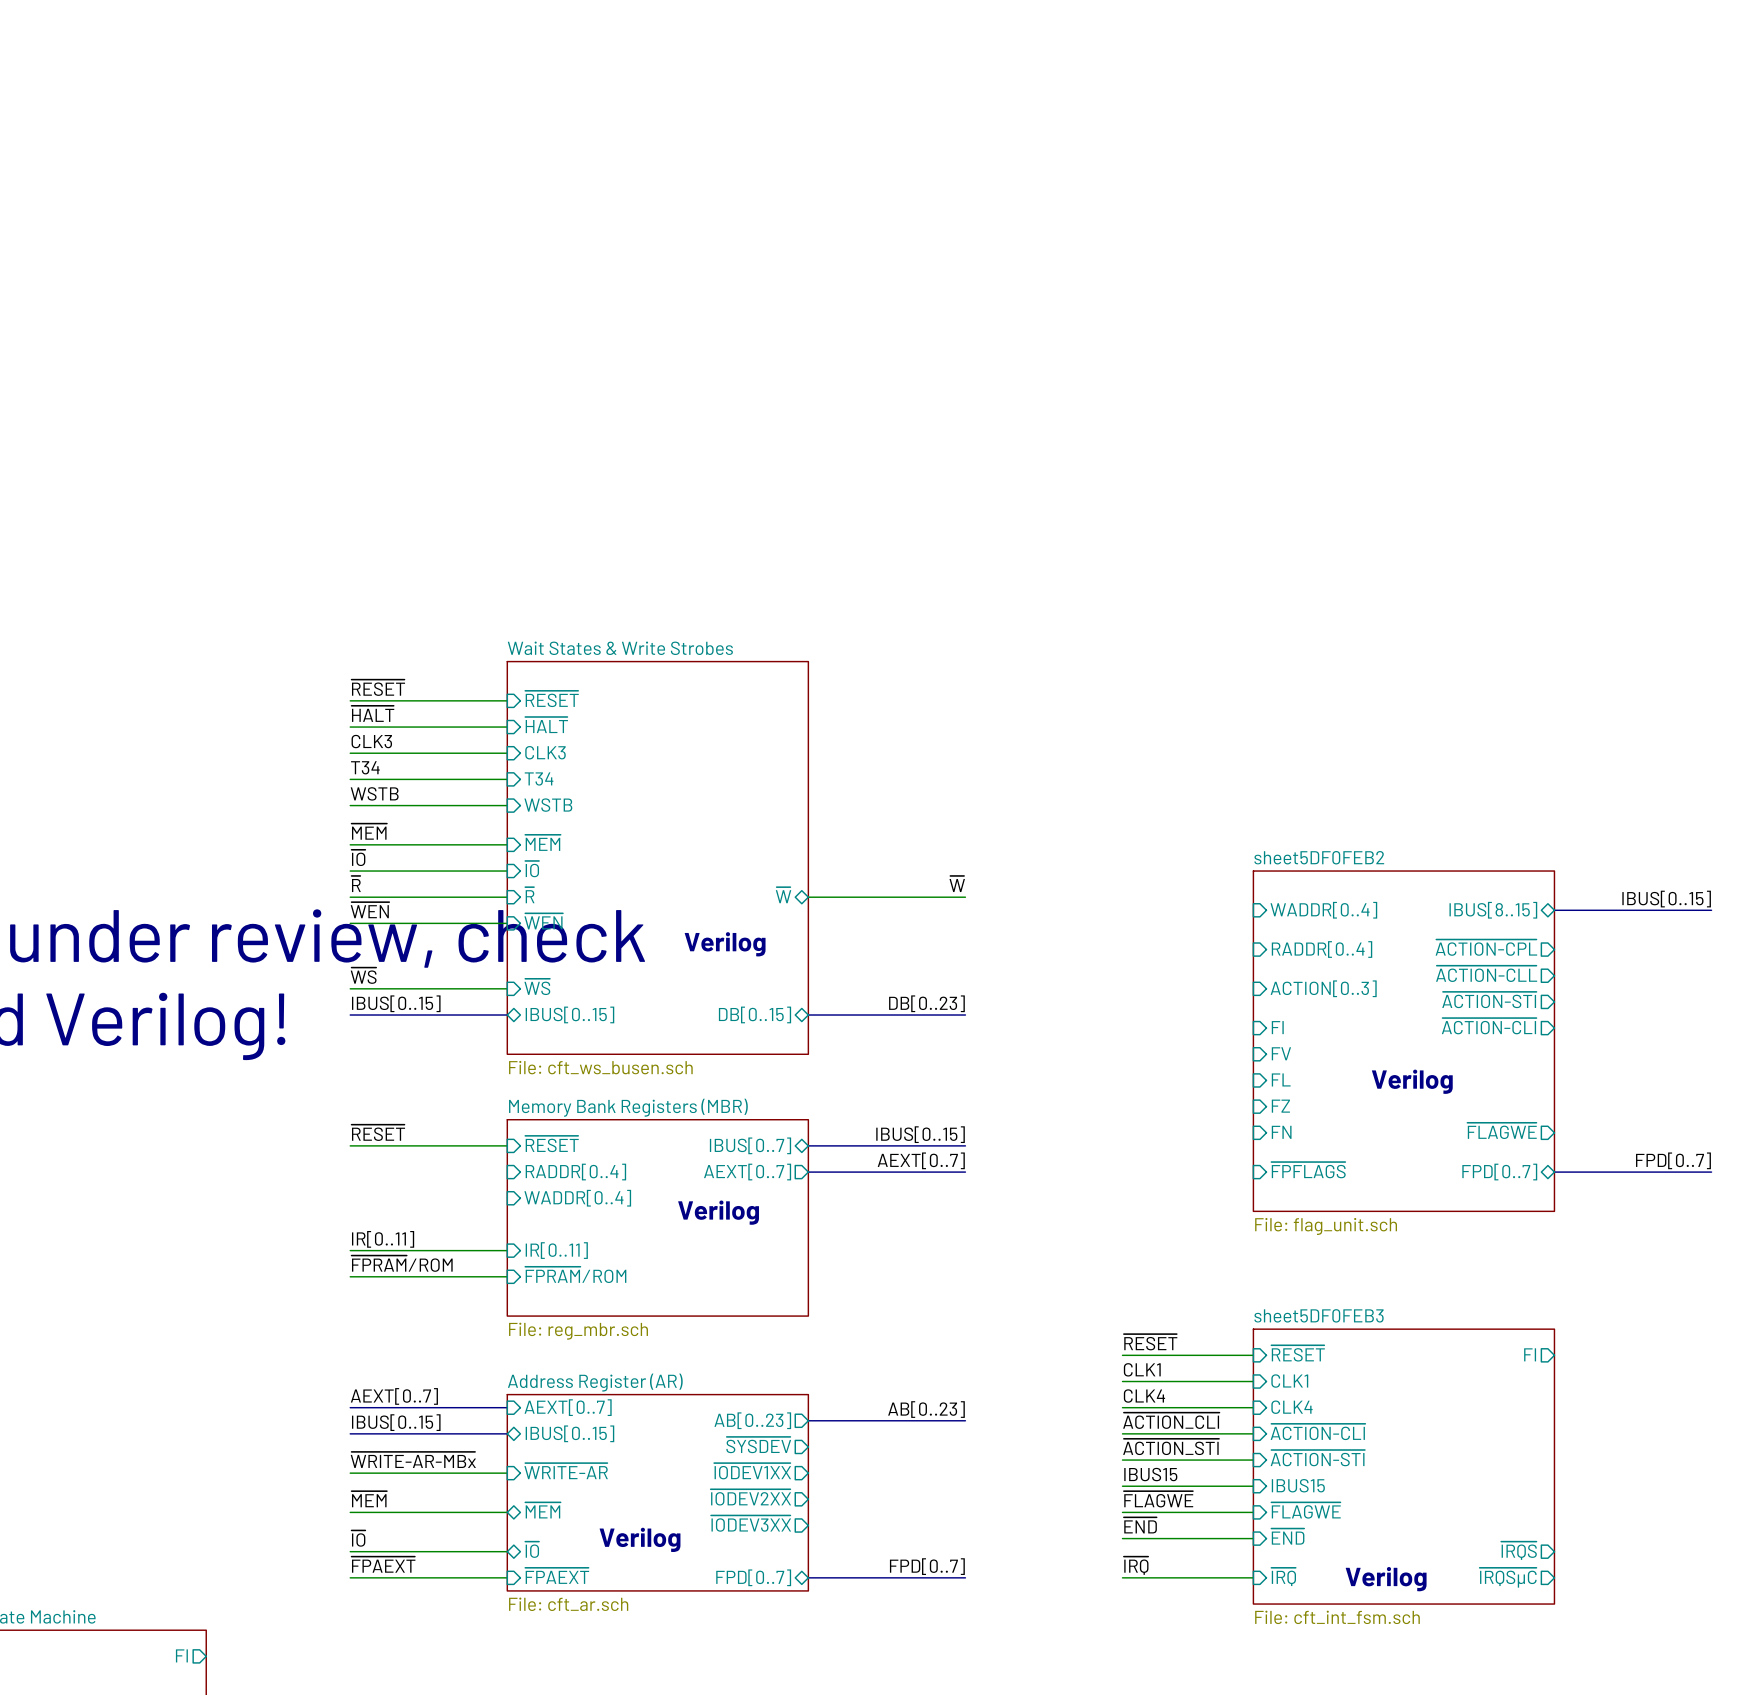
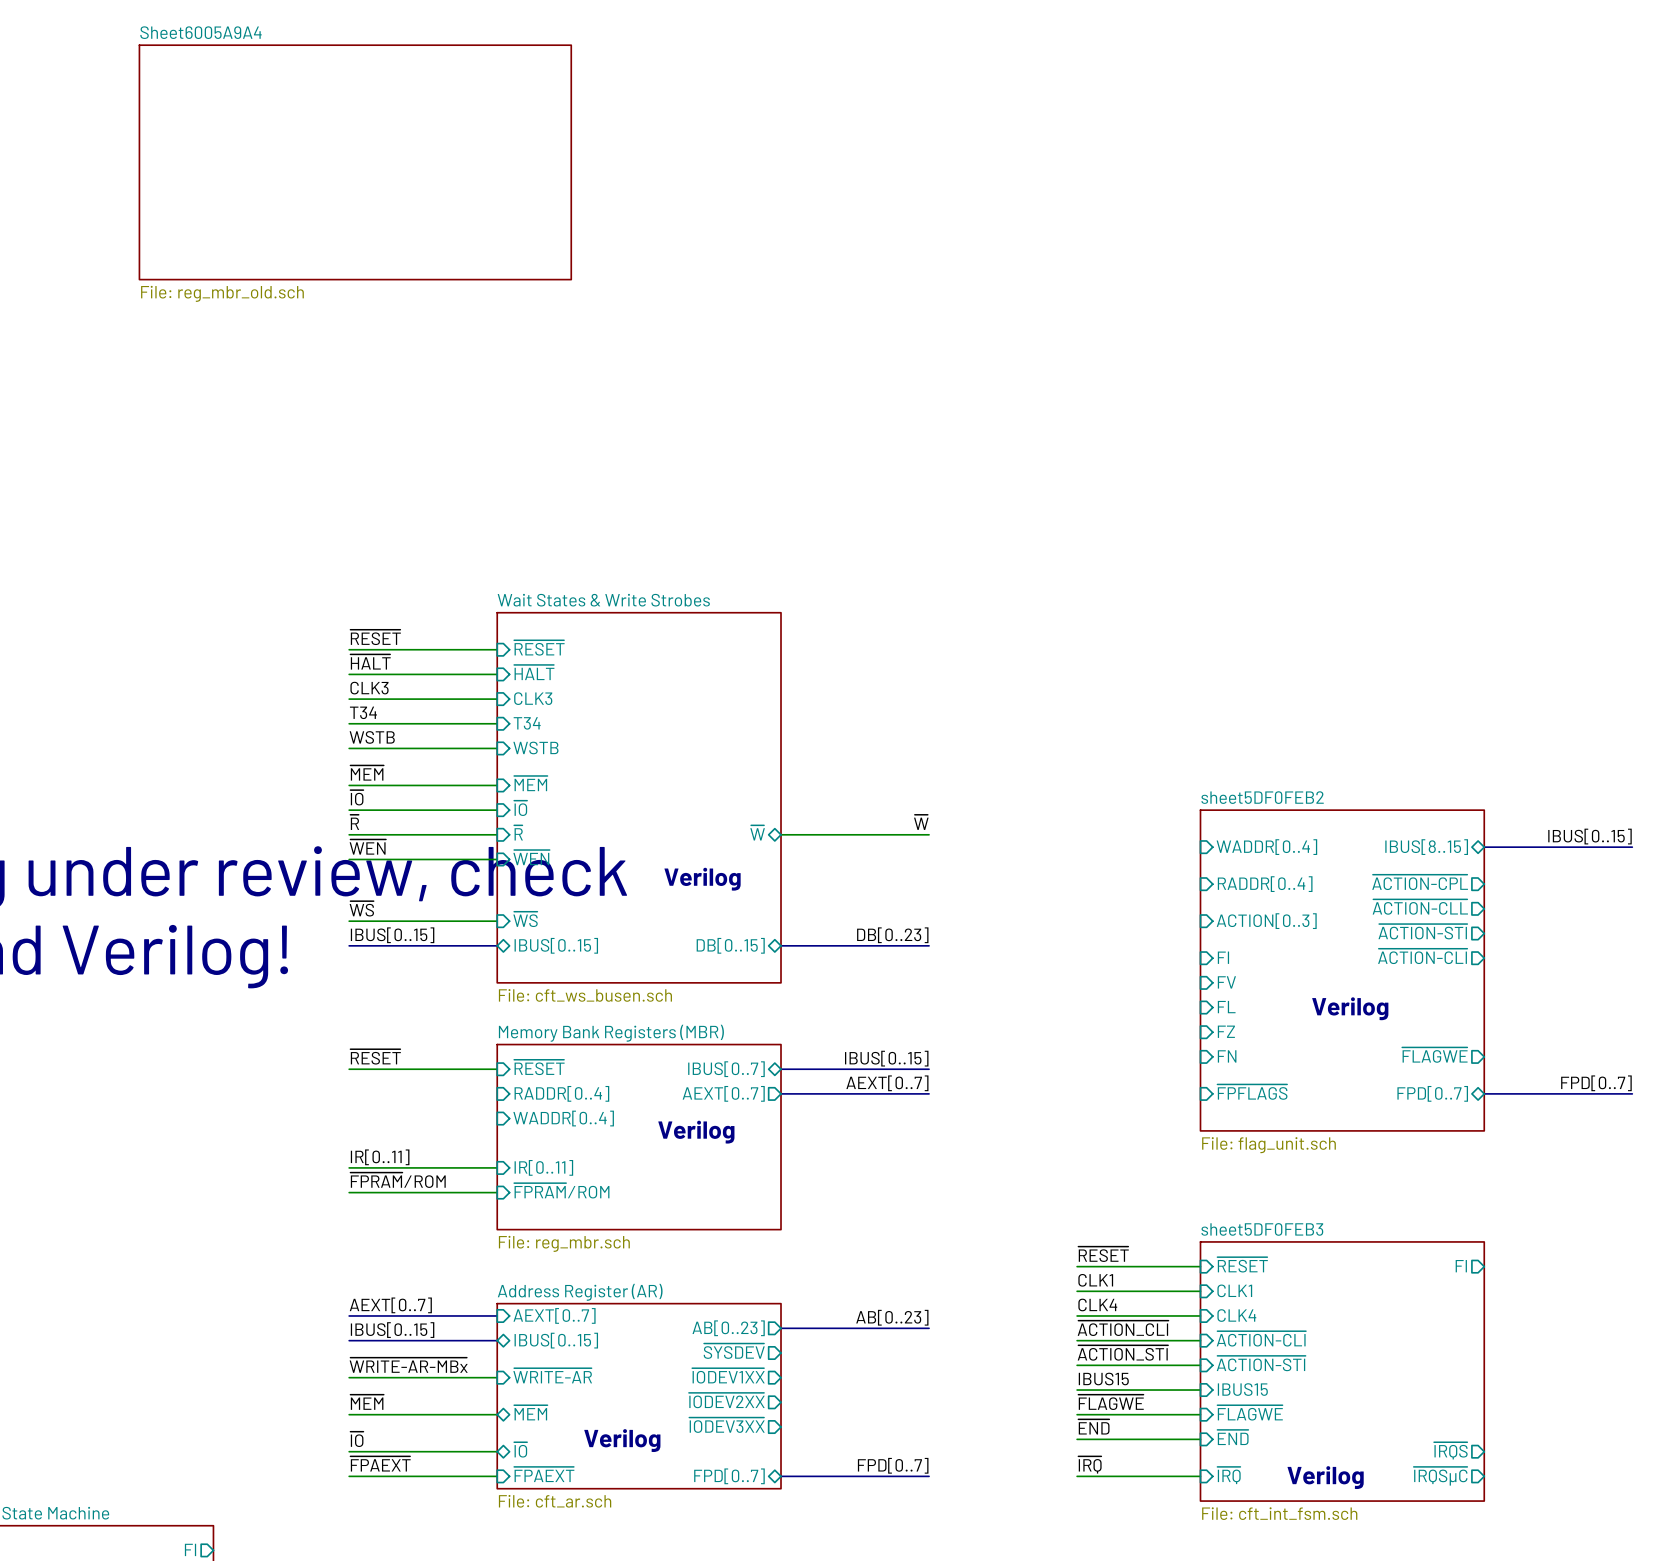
sheet Sheet6005A9A4: none -> File: reg_mbr_old.sch (355, 162)

